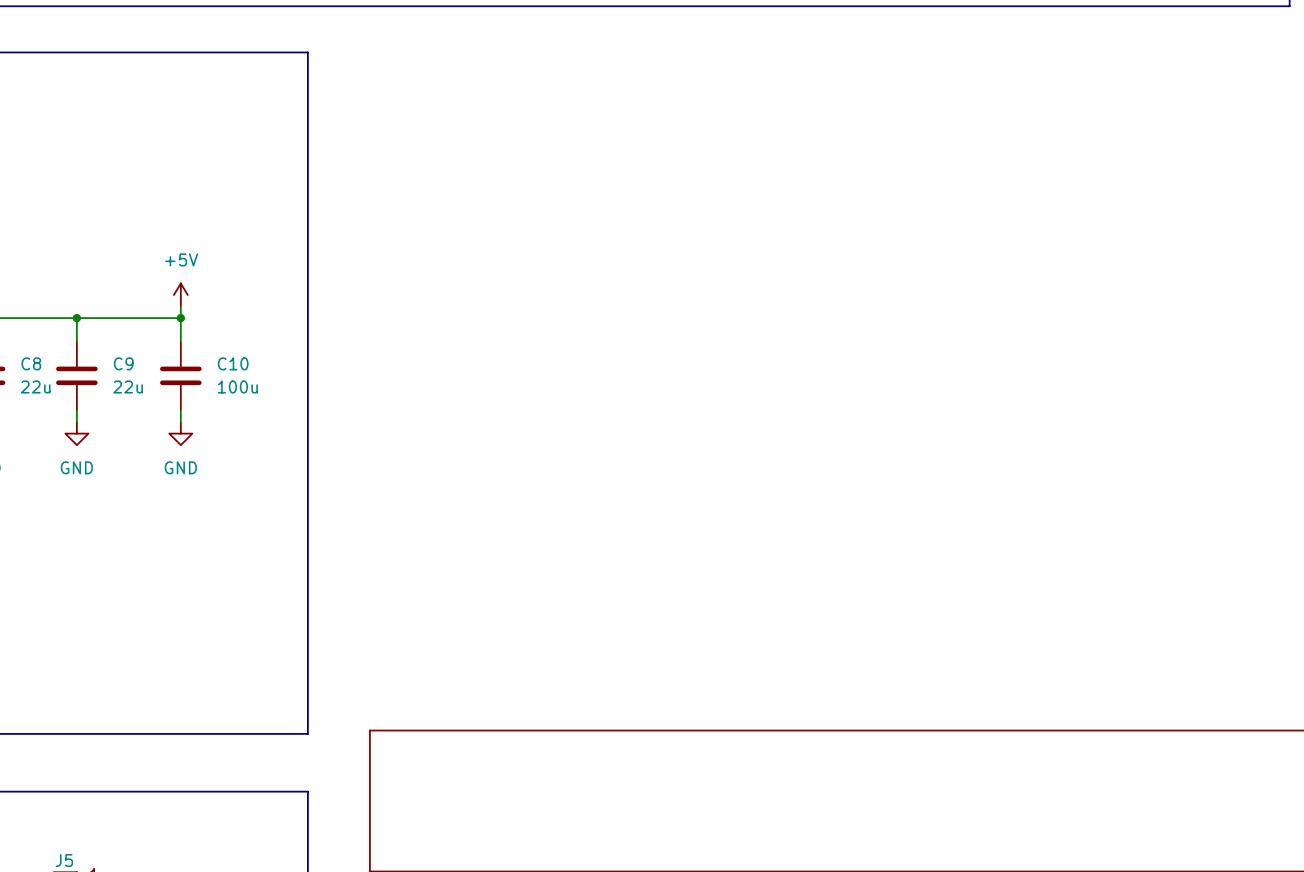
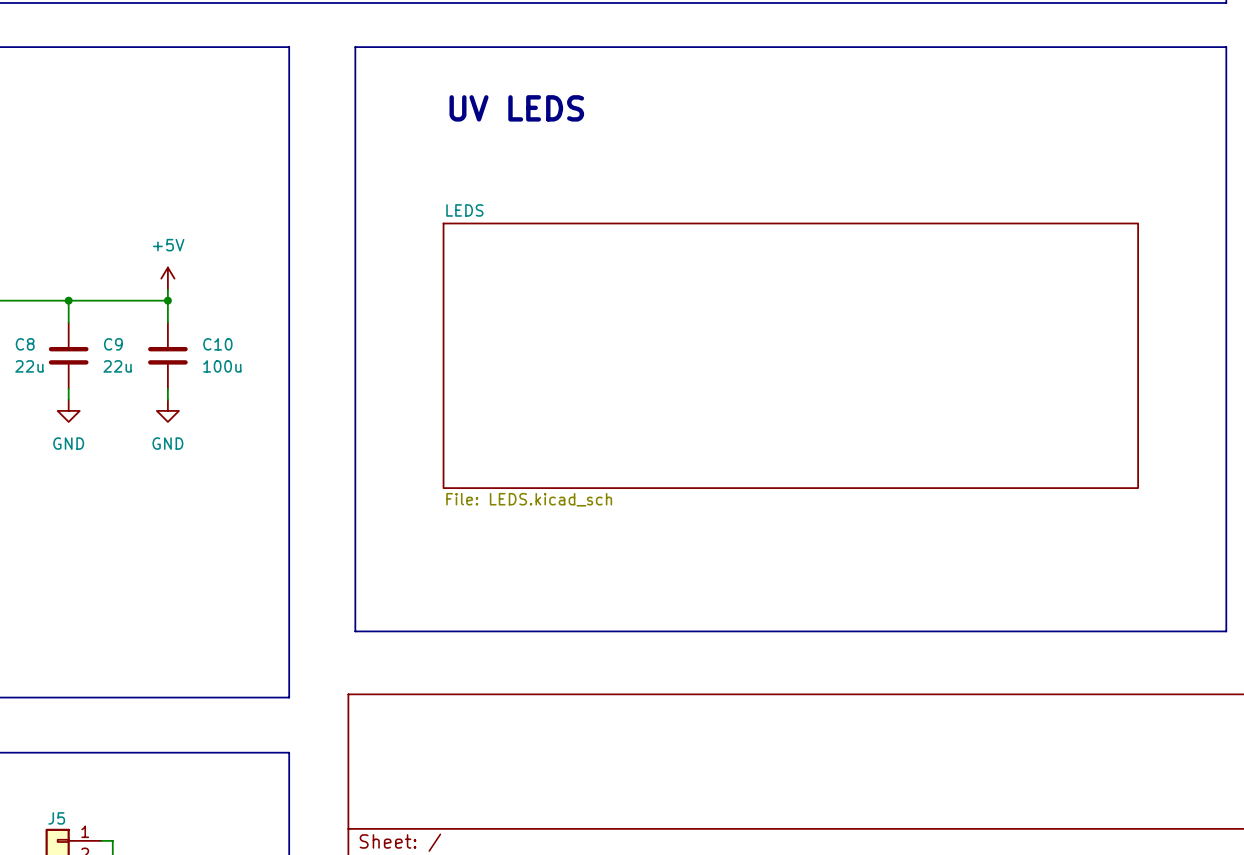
line: none -> (355, 47) (1226, 47) (1226, 631) (355, 631) (355, 47)
text: none -> UV LEDS (516, 108)
sheet LEDS: none -> File: LEDS.kicad_sch (790, 355)

